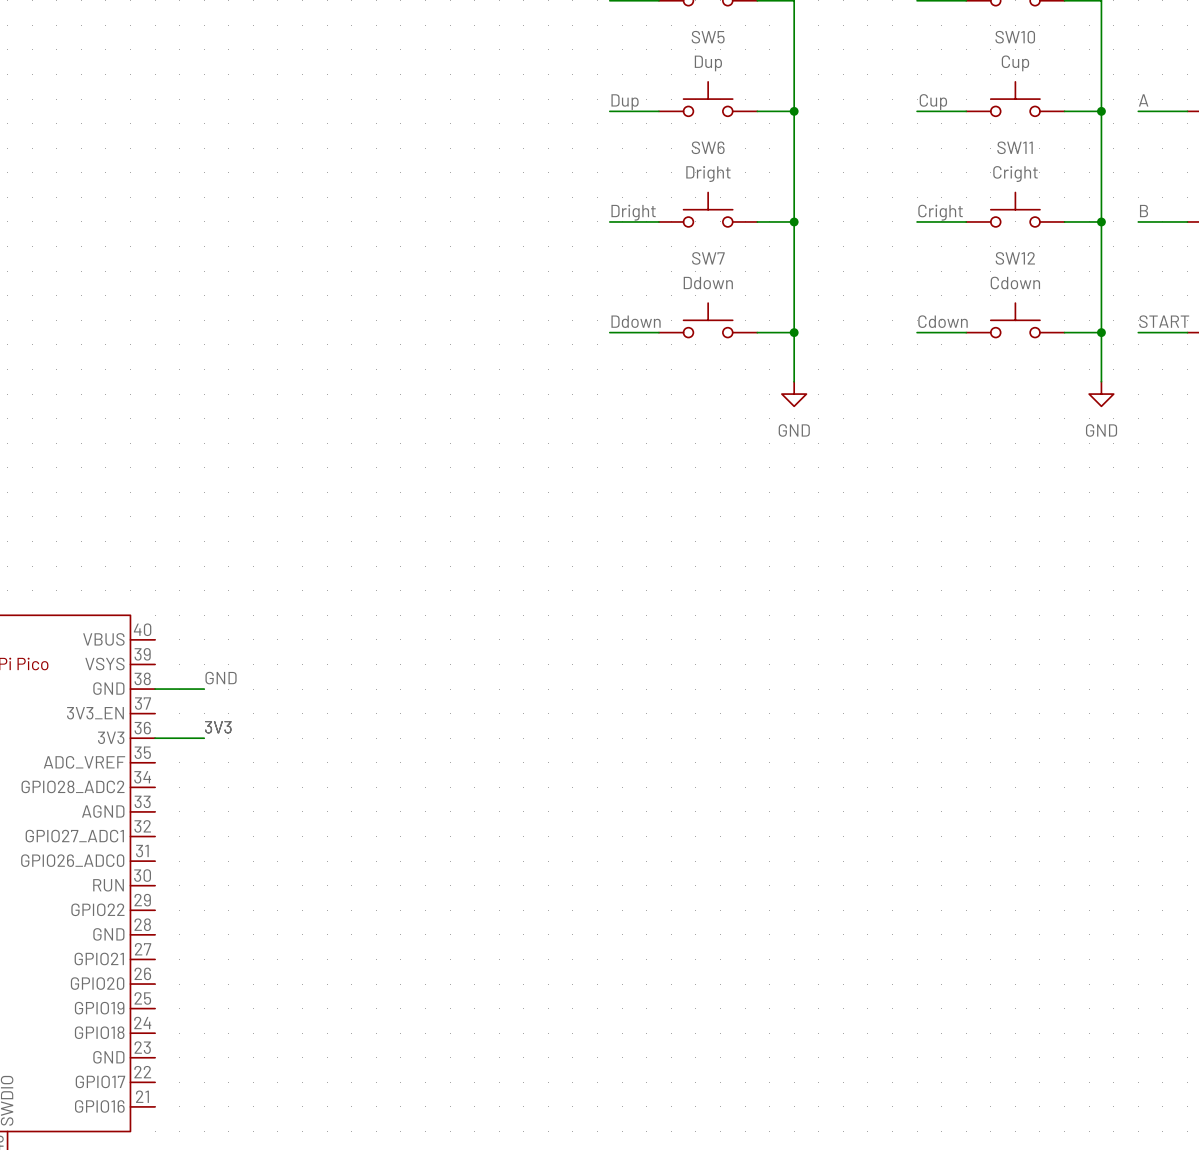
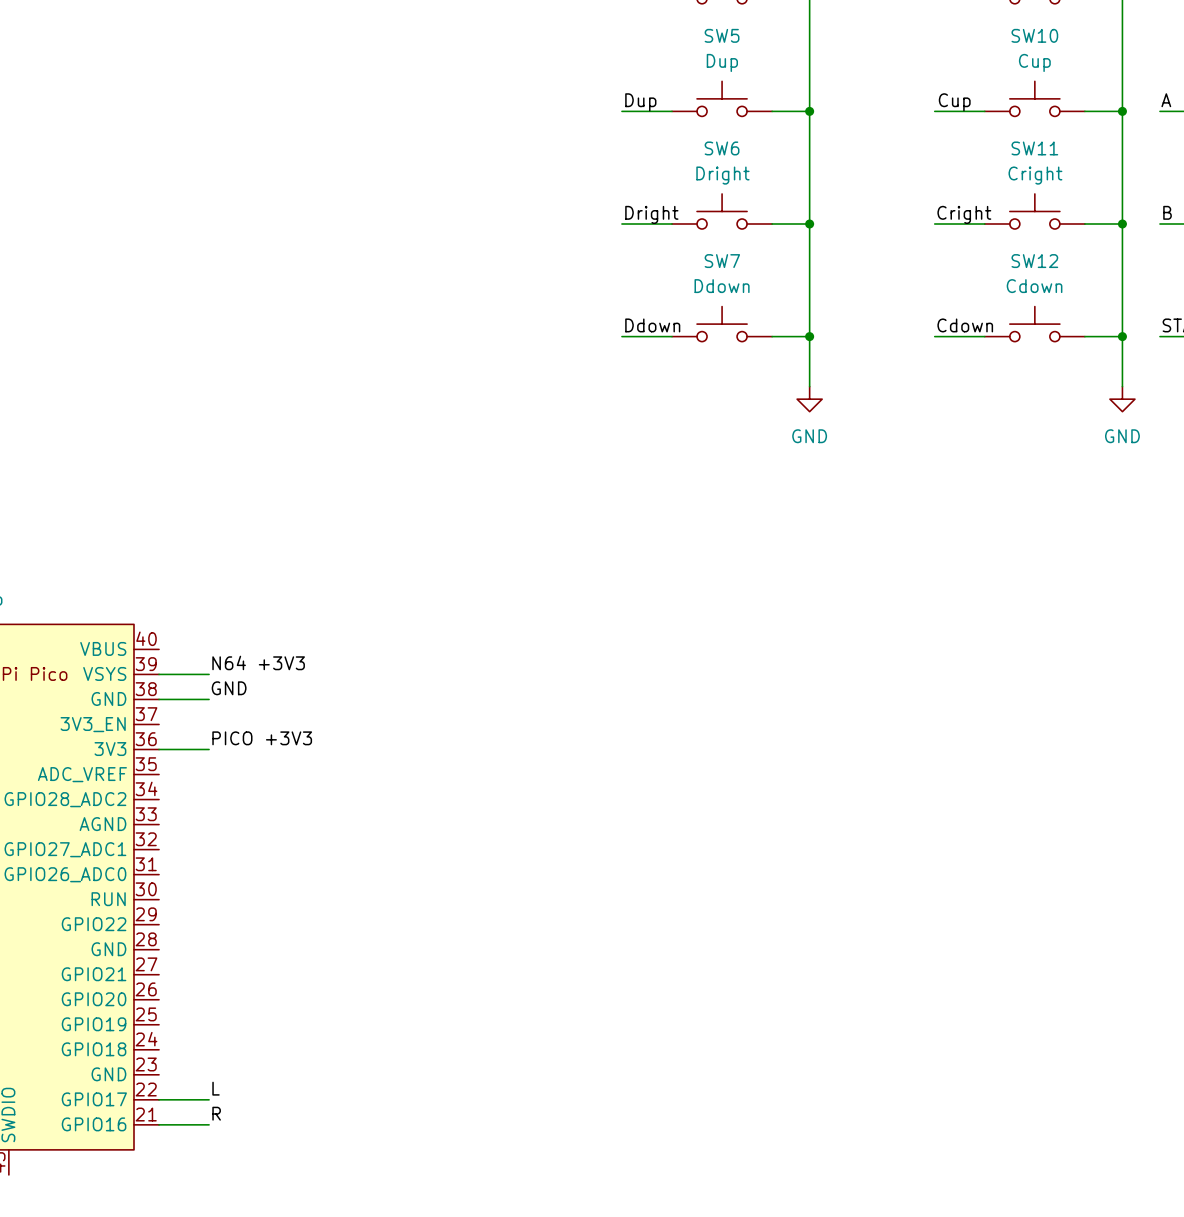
label: none -> N64 +3V3 (258, 662)
wire: none -> (159, 674) (209, 674)
label: 3V3 (218, 727) -> PICO +3V3 (262, 738)
label: none -> L (216, 1088)
wire: none -> (159, 1099) (209, 1099)
label: none -> R (216, 1113)
wire: none -> (159, 1124) (209, 1124)

